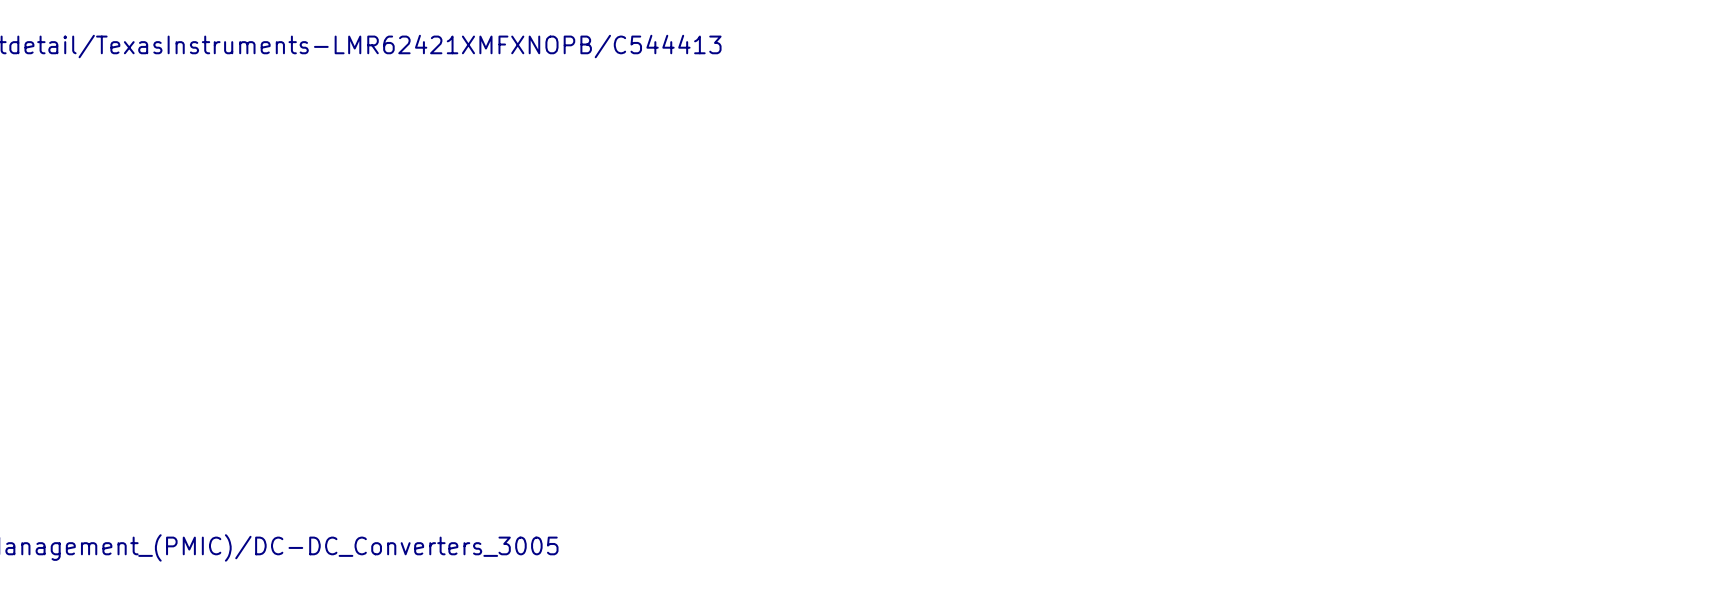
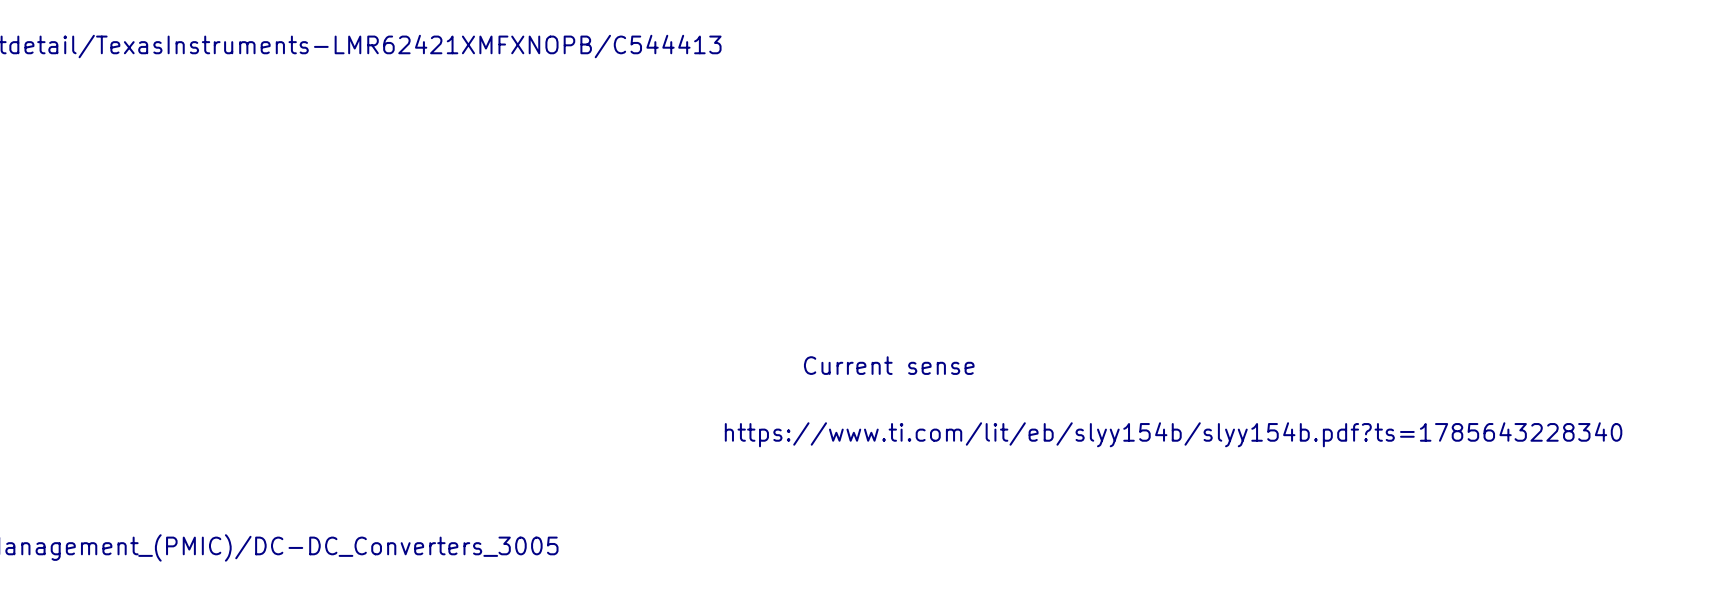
text: none -> Current sense (889, 365)
text: none -> https://www.ti.com/lit/eb/slyy154b/slyy154b.pdf?ts=1785643228340 (1173, 434)

